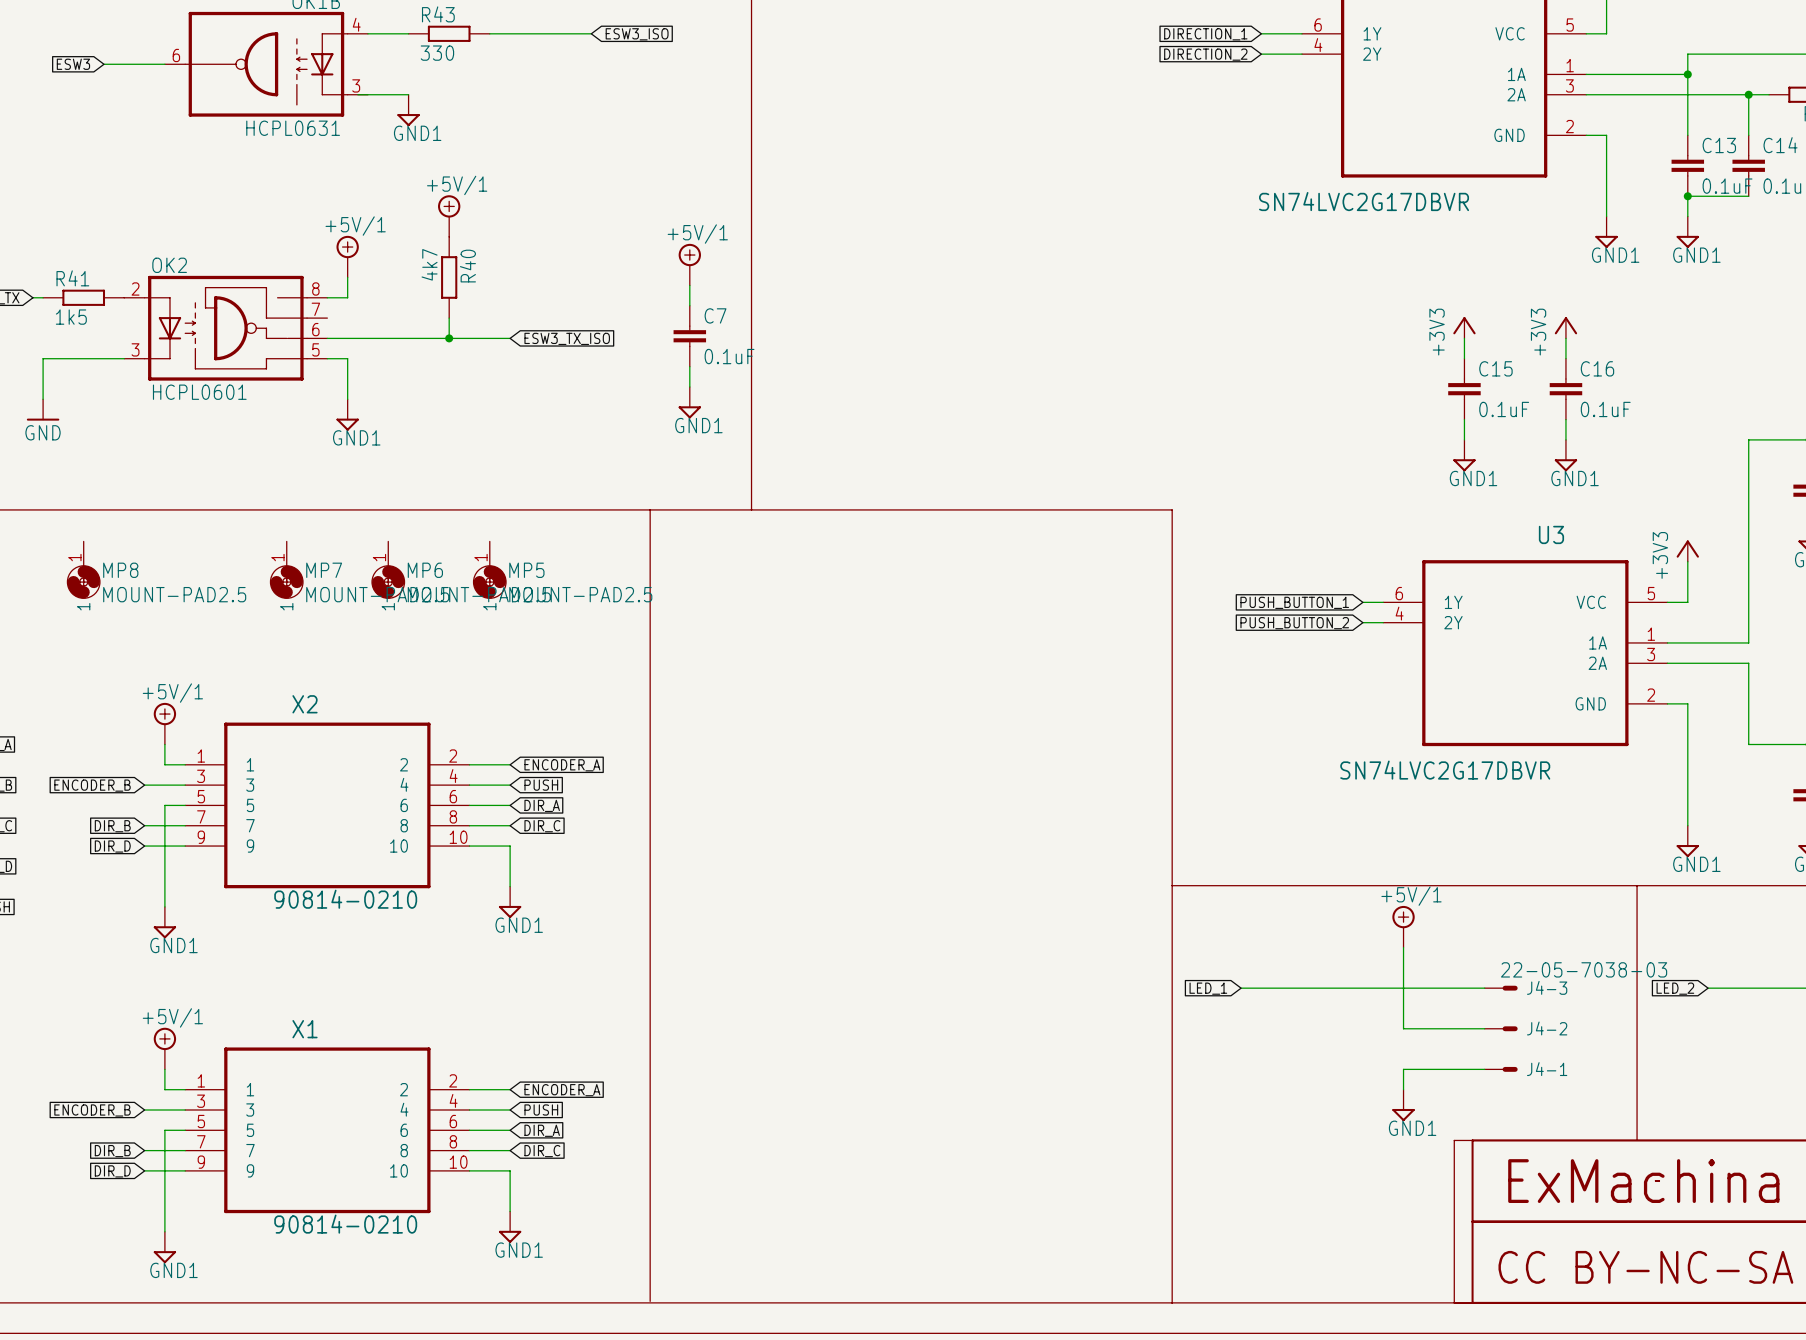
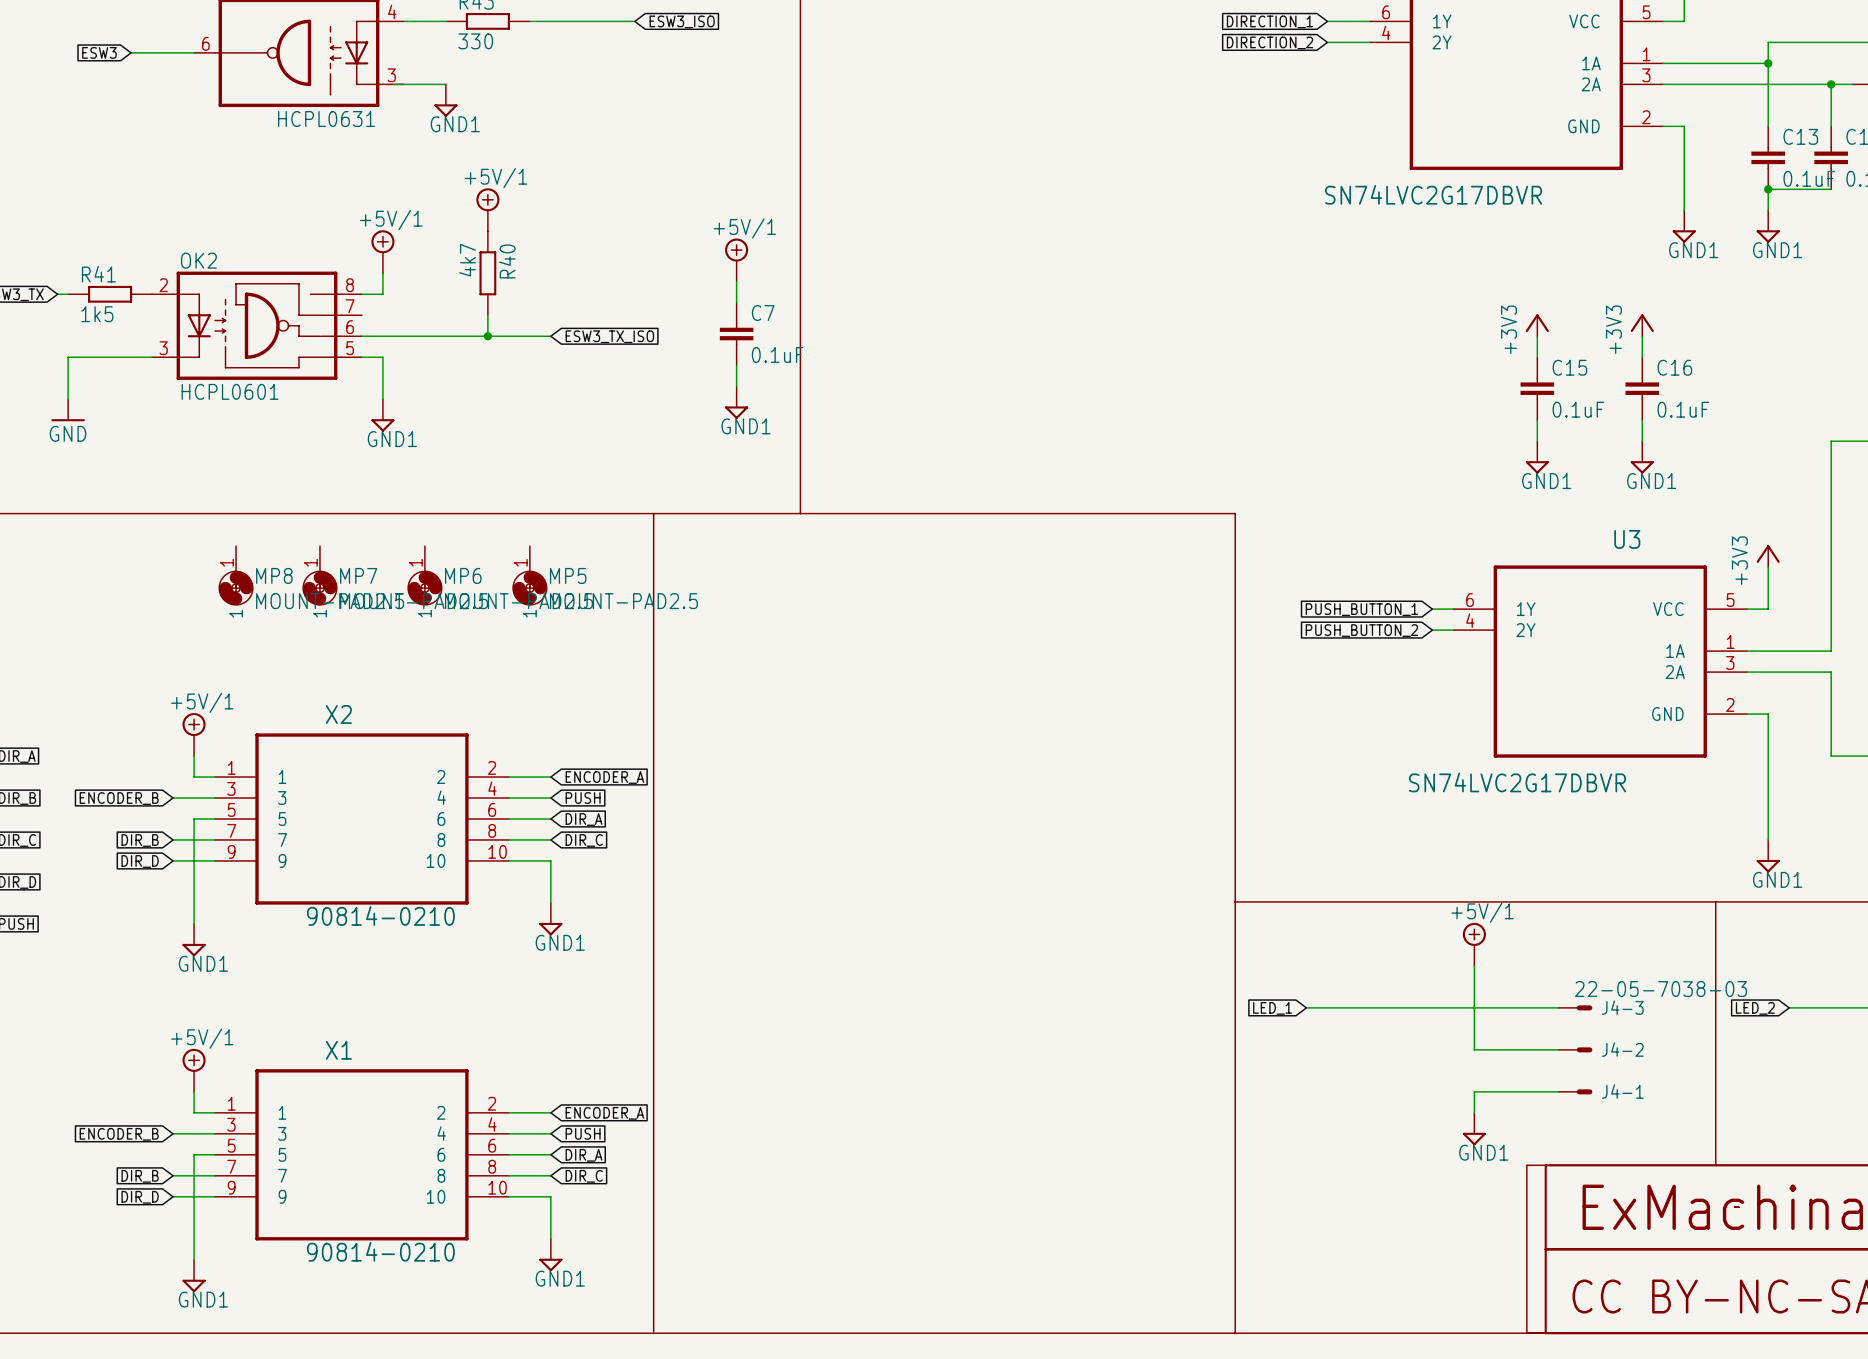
line: (650, 509) (650, 1301) -> (653, 513) (653, 1331)
MP8 position: (83, 569) -> (236, 575)

